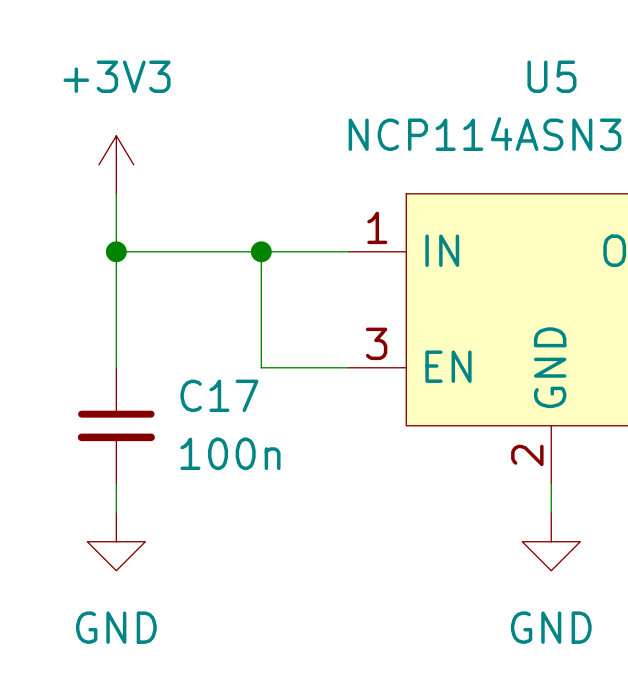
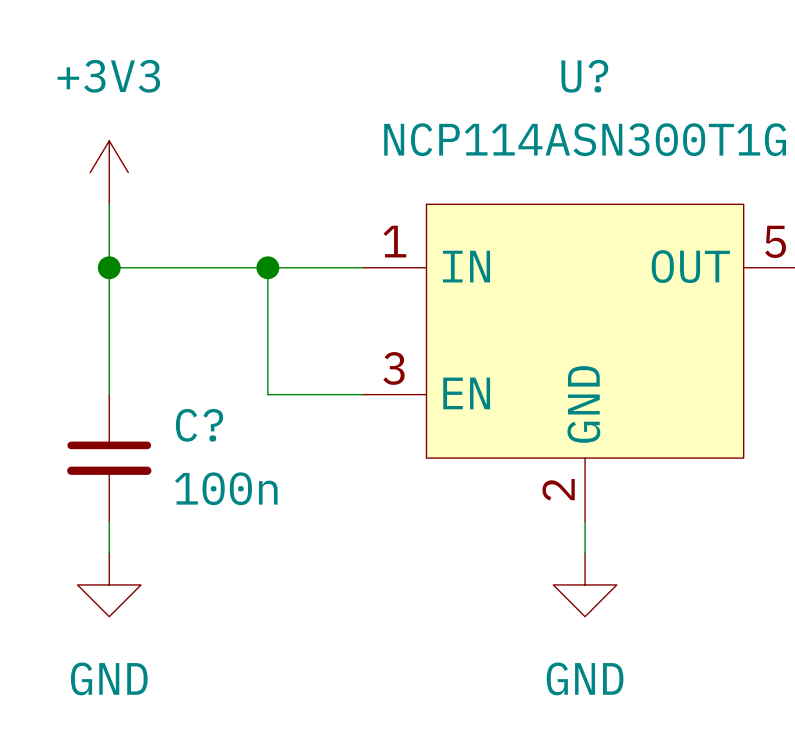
U5 name: U5 (551, 76) -> U? (584, 76)
C17 name: C17 (219, 395) -> C? (199, 425)

